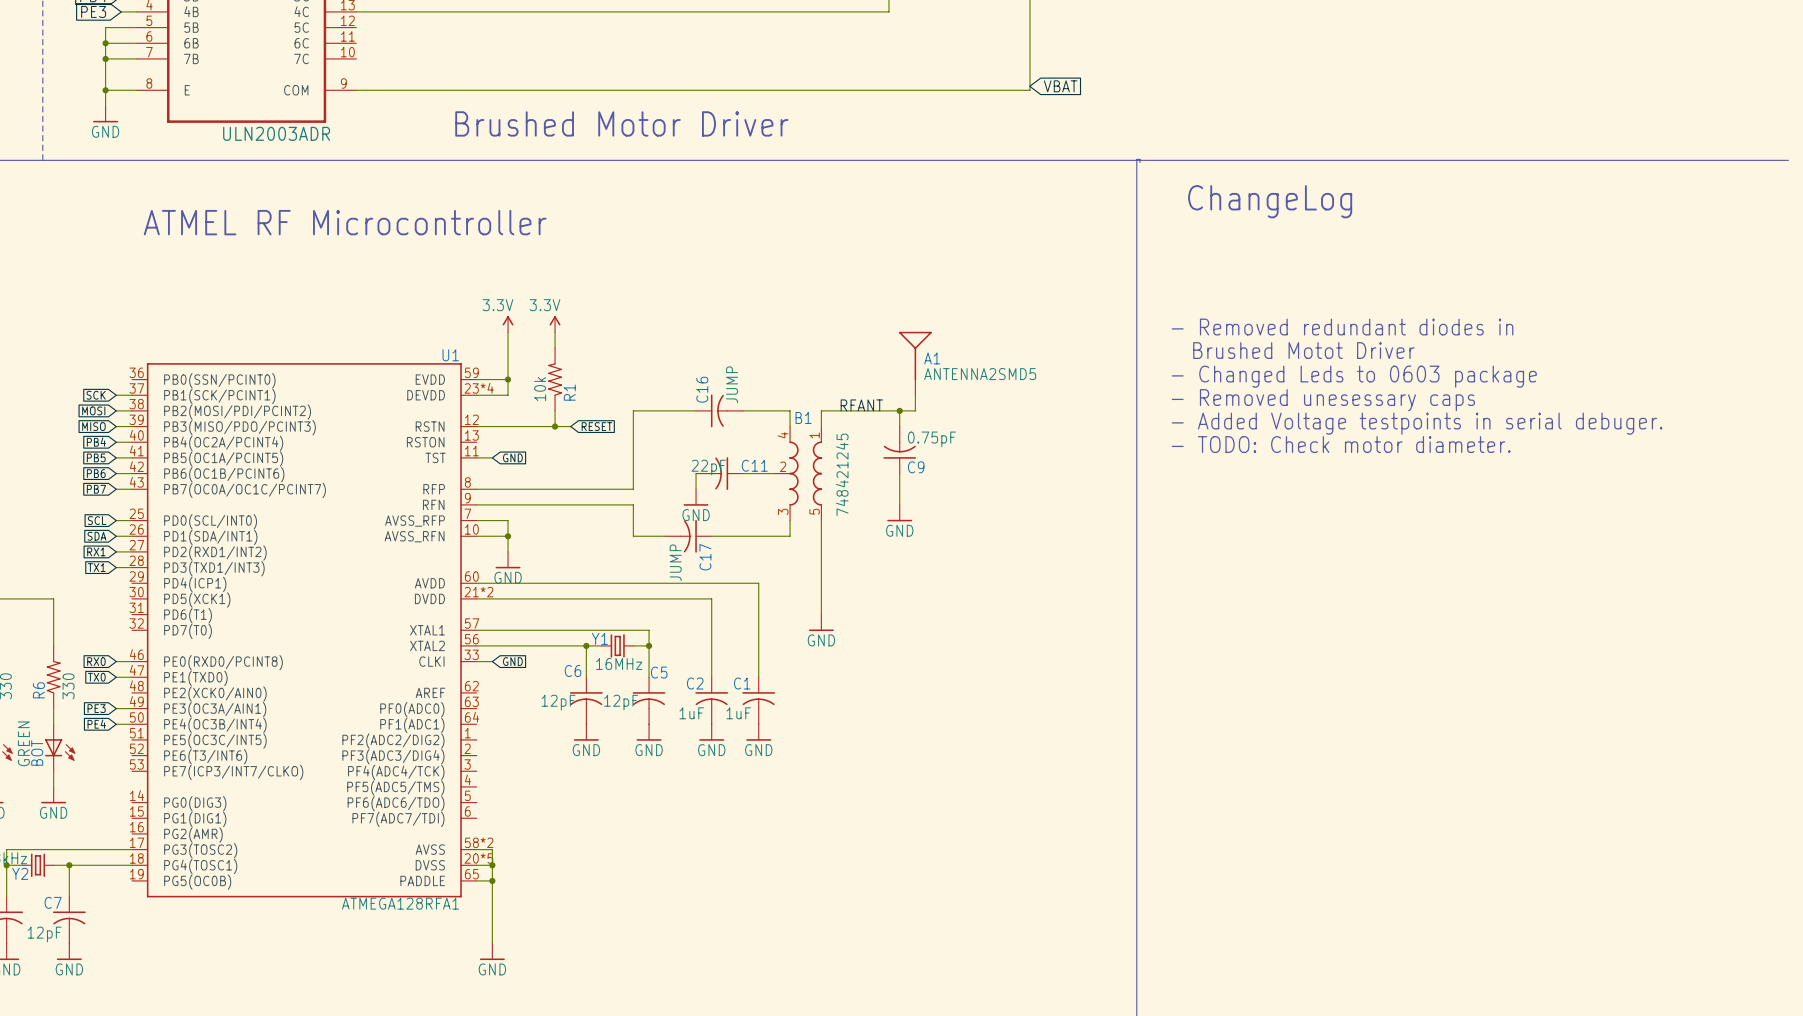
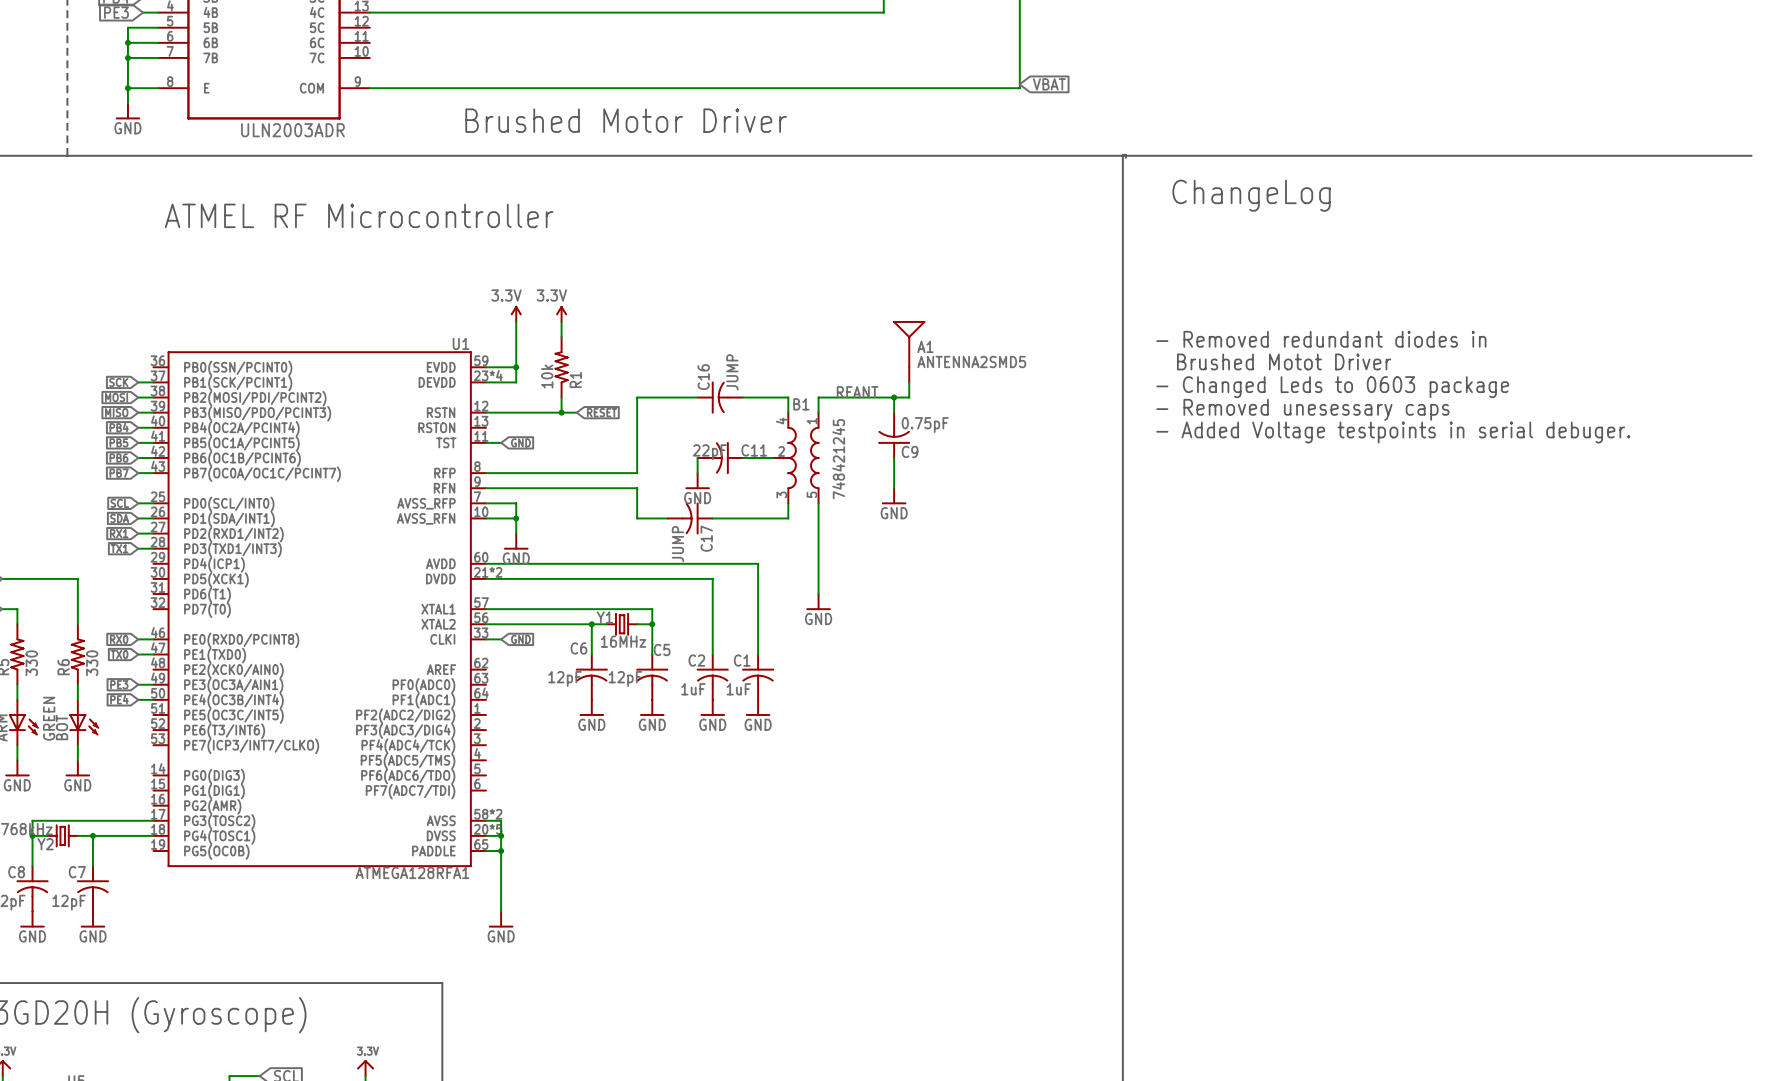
text: - Removed redundant diodes in (1342, 327) -> none
text: Brushed Motot Driver (1303, 350) -> - Removed redundant diodes in (1321, 339)
text: - Changed Leds to 0603 package (1354, 376) -> Brushed Motot Driver (1284, 361)
text: - Removed unesessary caps (1323, 400) -> - Changed Leds to 0603 package (1332, 387)
text: - Added Voltage testpoints in serial debuger. (1417, 423) -> - Removed unesessary caps (1302, 409)
text: - TODO: Check motor diameter. (1341, 444) -> - Added Voltage testpoints in serial debuger. (1393, 432)

